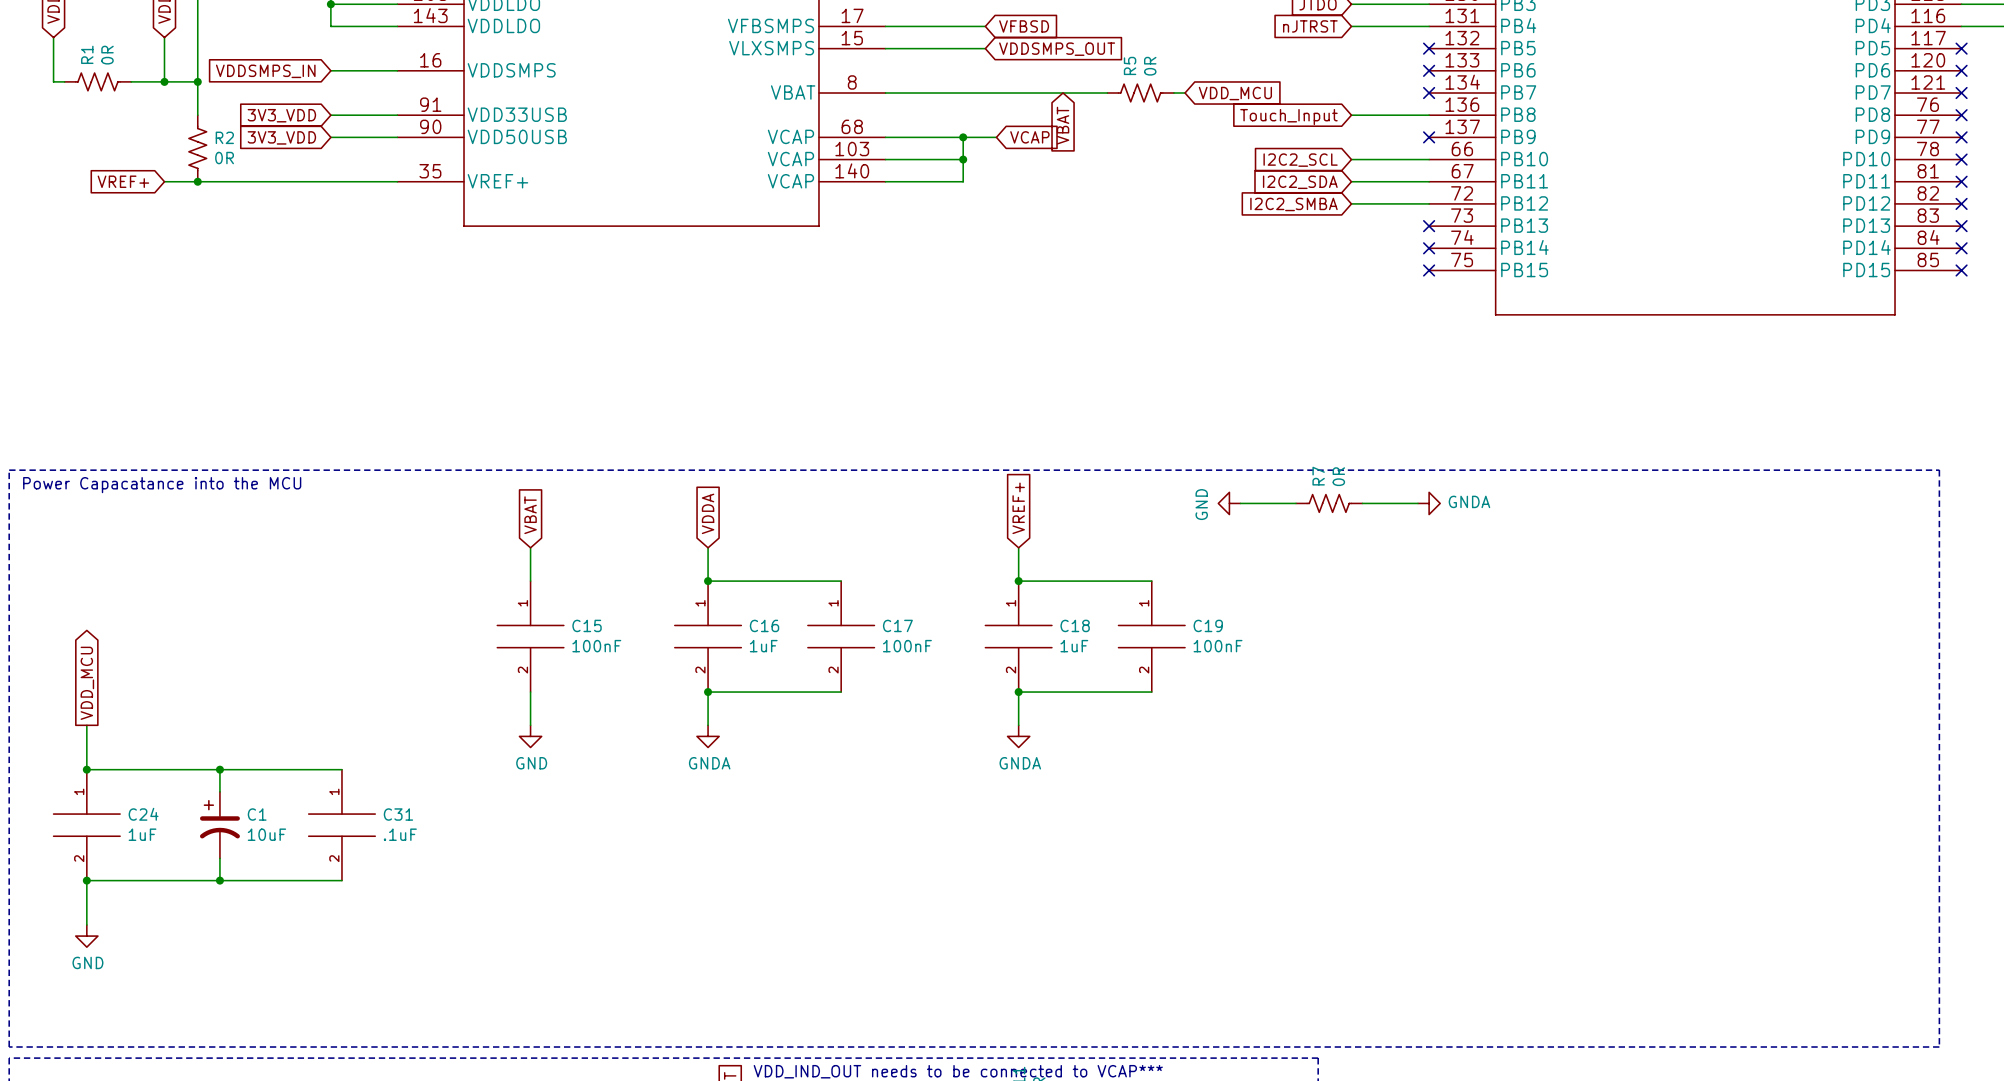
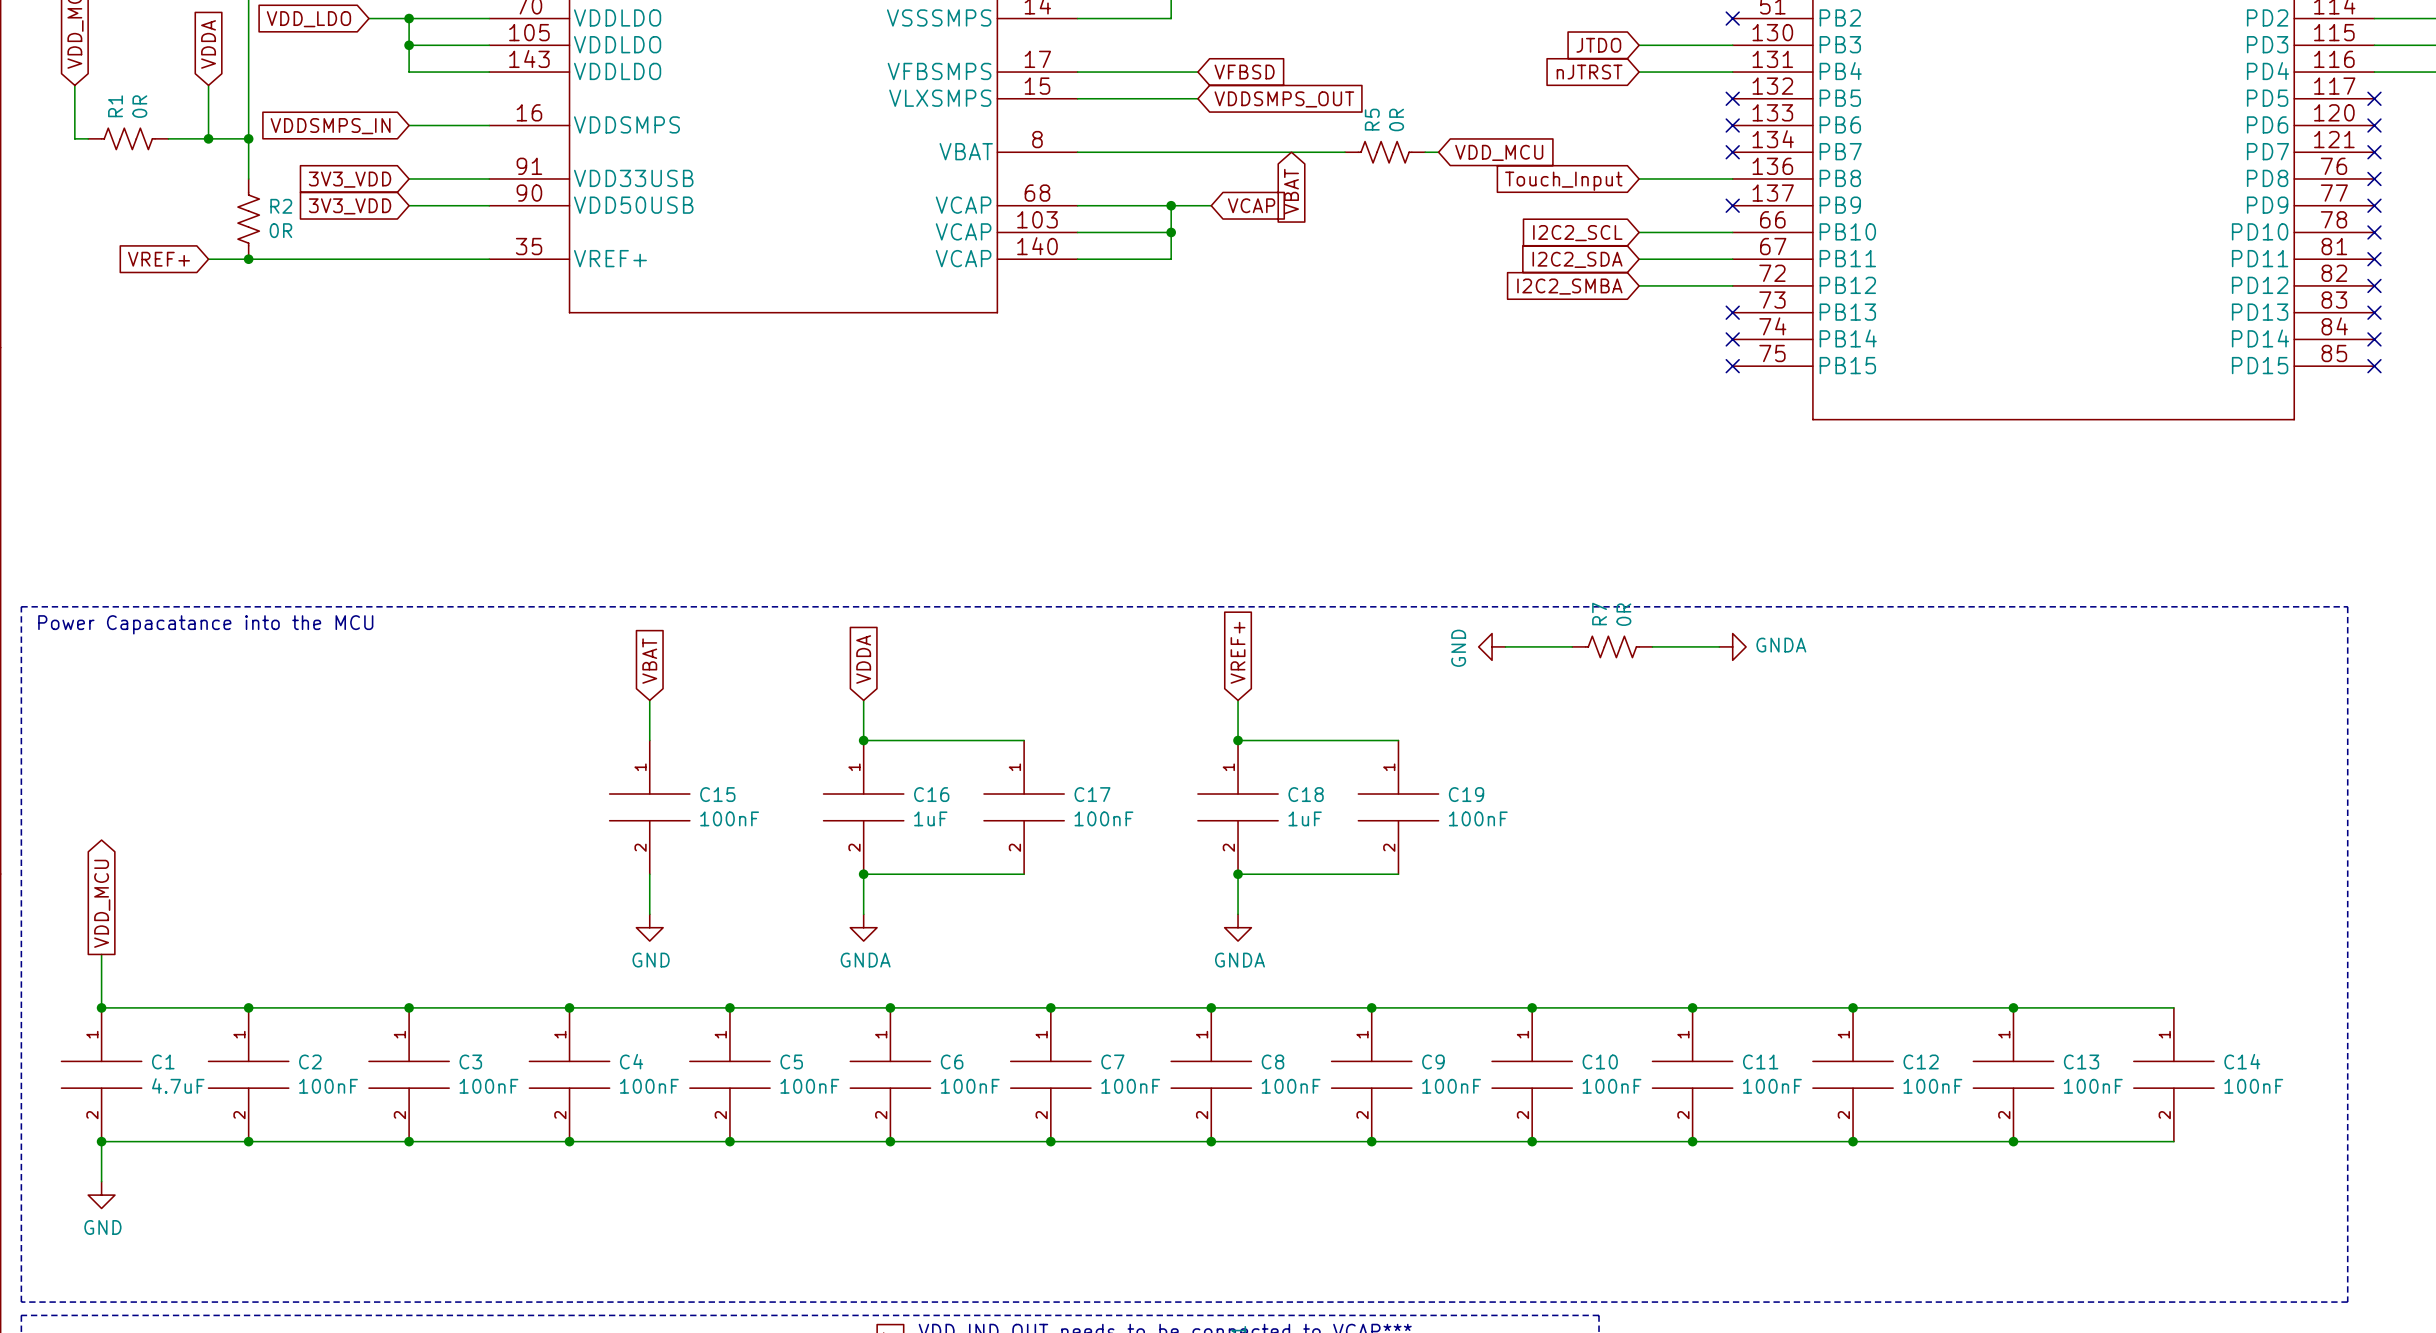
global label position: VDD_MCU (87, 683) -> VDD_MCU (102, 903)
wire: (86, 725) (86, 769) (341, 769) -> none
wire: none -> (101, 954) (101, 1007) (2173, 1007)
junction position: (86, 769) -> (101, 1007)
wire: (219, 769) (219, 791) -> none
junction position: (219, 769) -> (248, 1007)
C1 symbol: [199, 791, 240, 859] -> [61, 1007, 142, 1142]
junction: none -> (409, 1007)
junction: none -> (569, 1007)
junction: none -> (729, 1007)
junction: none -> (890, 1007)
junction: none -> (1050, 1007)
junction: none -> (1211, 1007)
junction: none -> (1371, 1007)
junction: none -> (1532, 1007)
junction: none -> (1692, 1007)
junction: none -> (1853, 1007)
junction: none -> (2013, 1007)
C24: 1uF (86, 825) -> none
C31: .1uF (341, 825) -> none
C1 value: 10uF (266, 834) -> 4.7uF (178, 1085)
C2: none -> 100nF (248, 1074)
wire: (219, 858) (219, 880) -> none
C3: none -> 100nF (409, 1074)
C4: none -> 100nF (569, 1074)
C5: none -> 100nF (729, 1074)
C6: none -> 100nF (890, 1074)
C7: none -> 100nF (1050, 1074)
C8: none -> 100nF (1211, 1074)
C9: none -> 100nF (1371, 1074)
C10: none -> 100nF (1532, 1074)
C11: none -> 100nF (1692, 1074)
C12: none -> 100nF (1853, 1074)
C13: none -> 100nF (2013, 1074)
C14: none -> 100nF (2173, 1074)
junction position: (86, 880) -> (101, 1141)
junction position: (219, 880) -> (248, 1141)
wire: (341, 880) (86, 880) (86, 924) -> none
junction: none -> (409, 1141)
junction: none -> (569, 1141)
junction: none -> (729, 1141)
junction: none -> (890, 1141)
junction: none -> (1050, 1141)
junction: none -> (1211, 1141)
junction: none -> (1371, 1141)
junction: none -> (1532, 1141)
junction: none -> (1692, 1141)
junction: none -> (1853, 1141)
junction: none -> (2013, 1141)
wire: none -> (2173, 1141) (101, 1141) (101, 1181)
power symbol position: GND (86, 936) -> GND (101, 1195)

